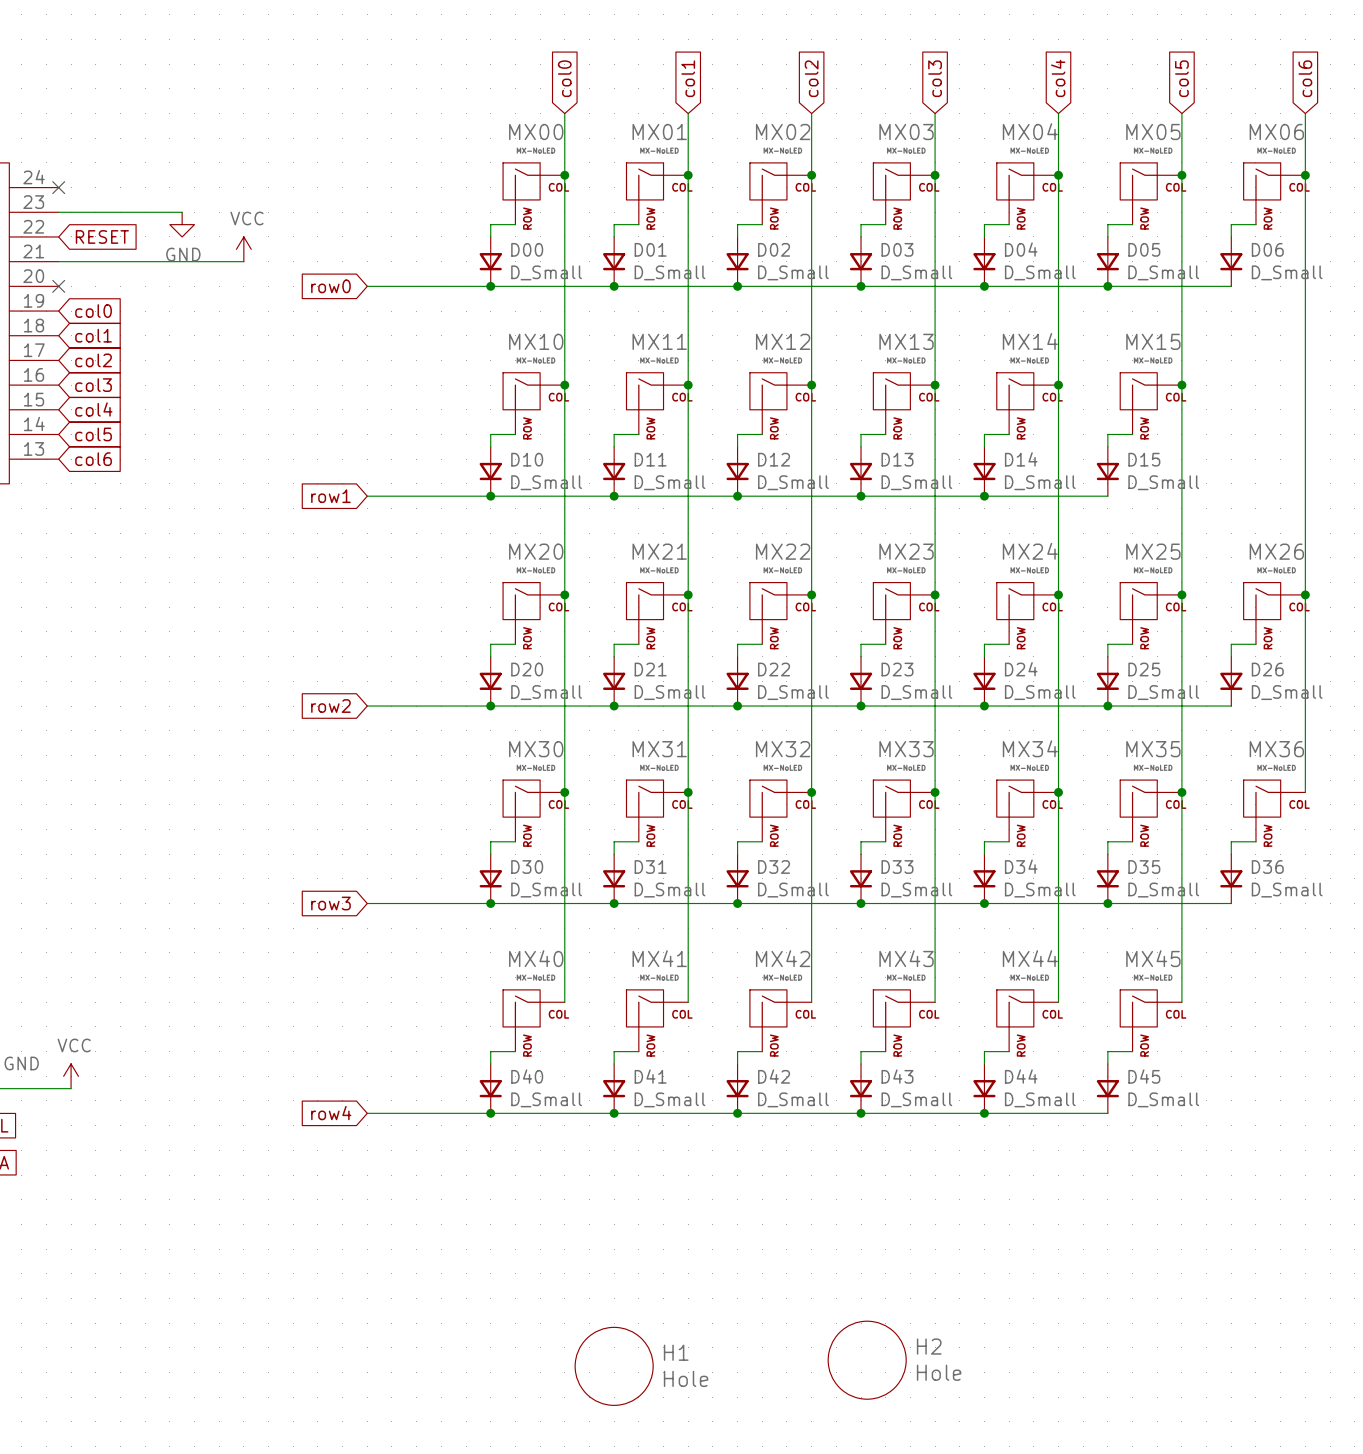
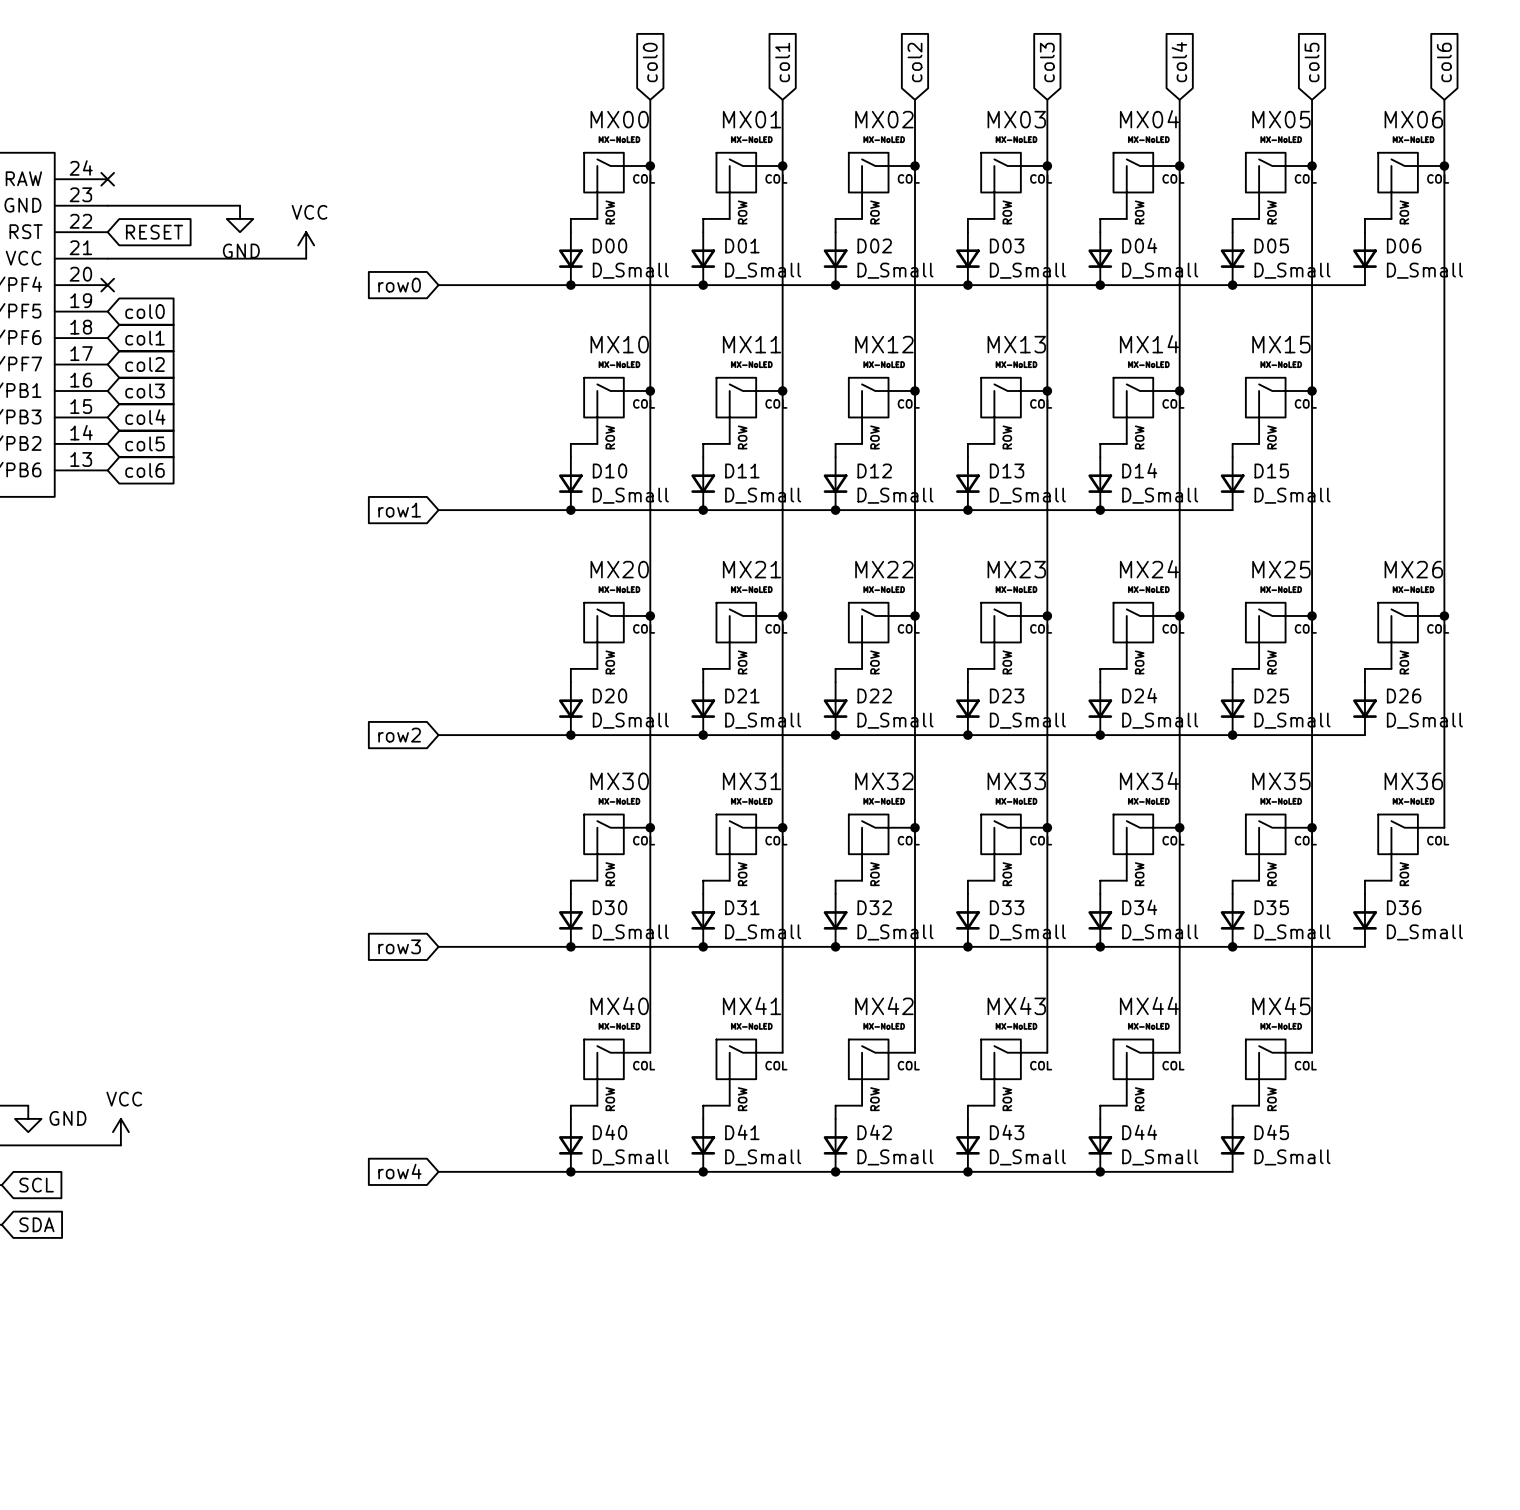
H2: Hole (867, 1360) -> none
H1: Hole (614, 1366) -> none

